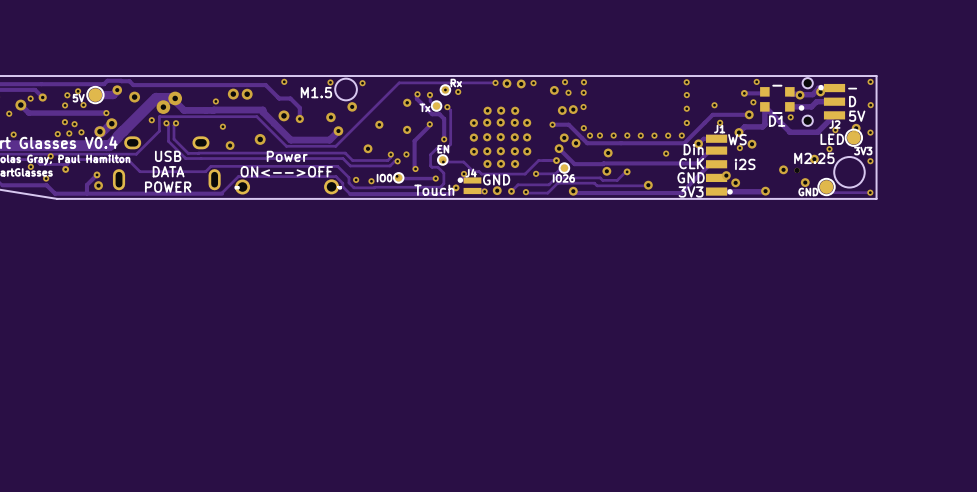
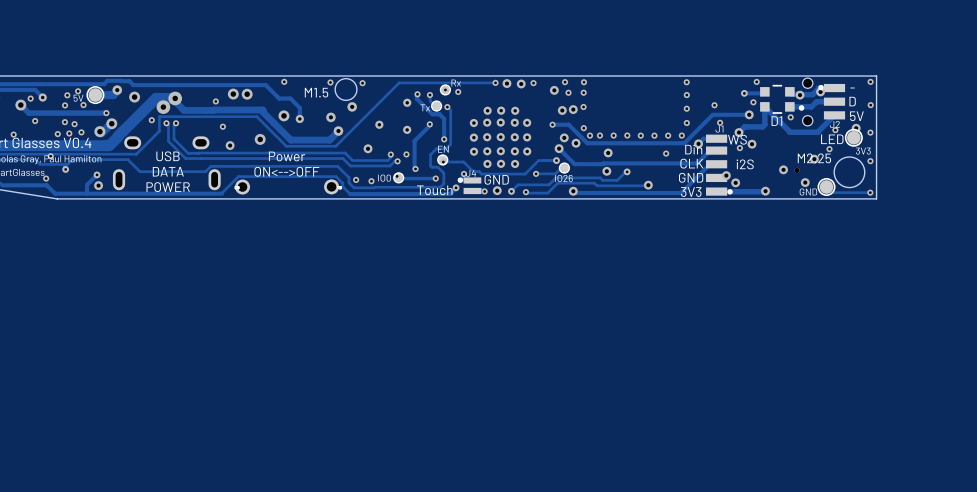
via: (9, 113) -> none
via: none -> (35, 121)
via: (30, 166) -> none

